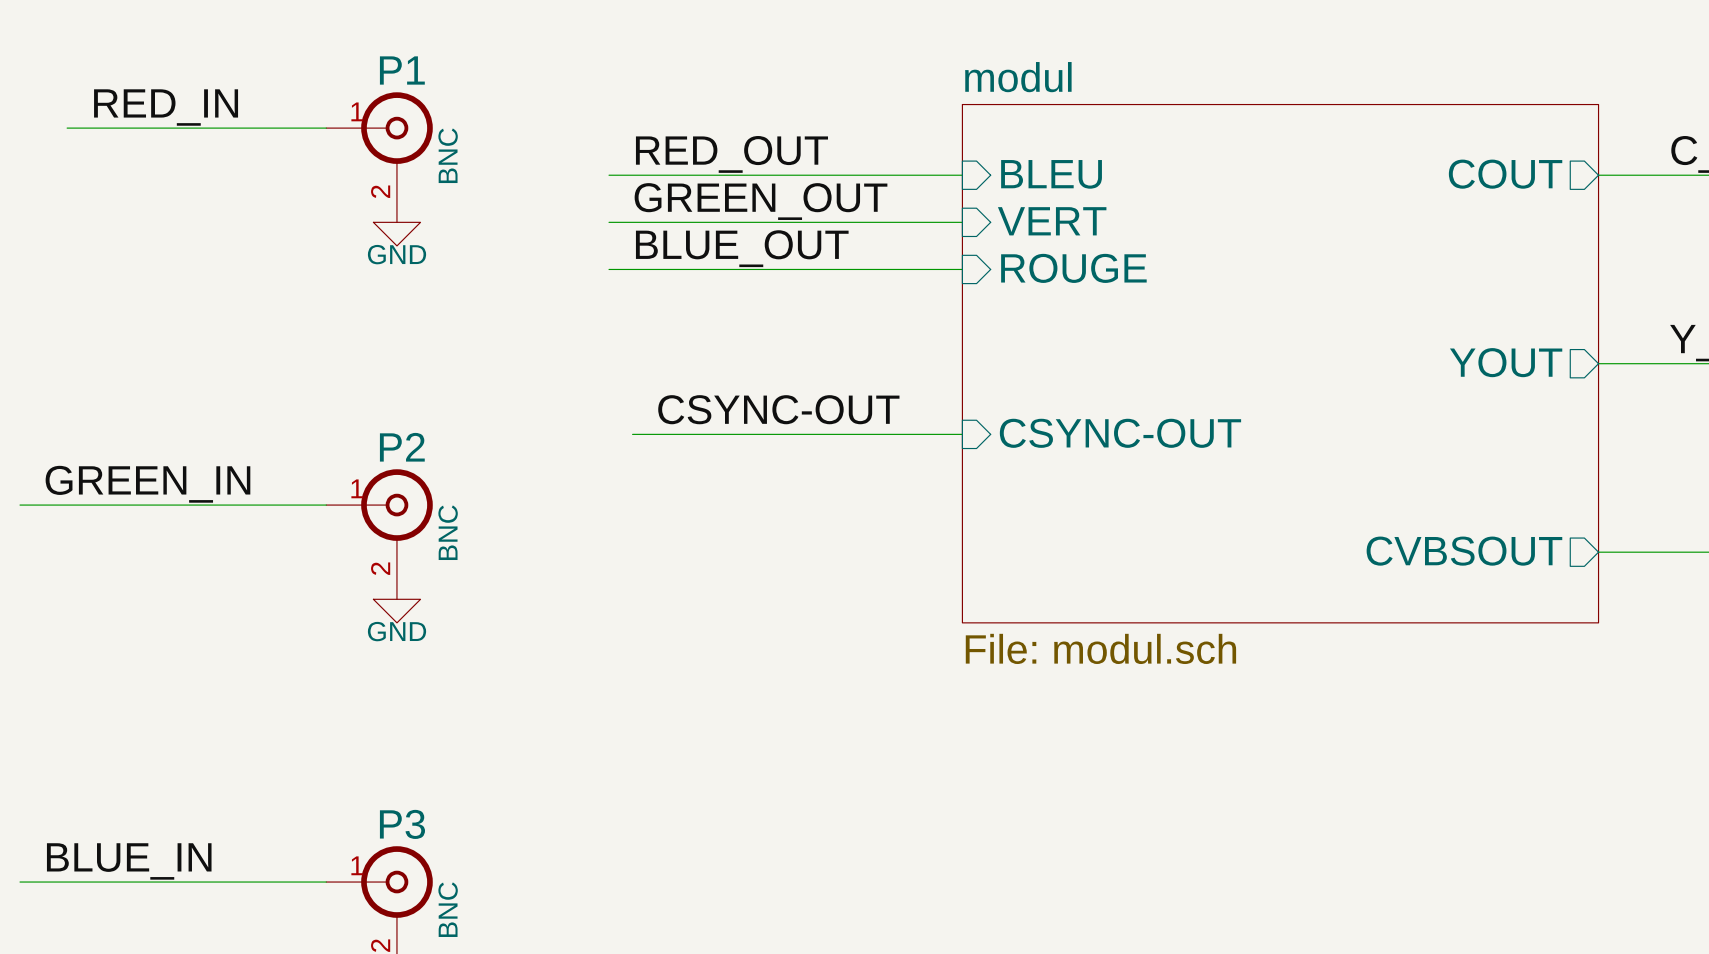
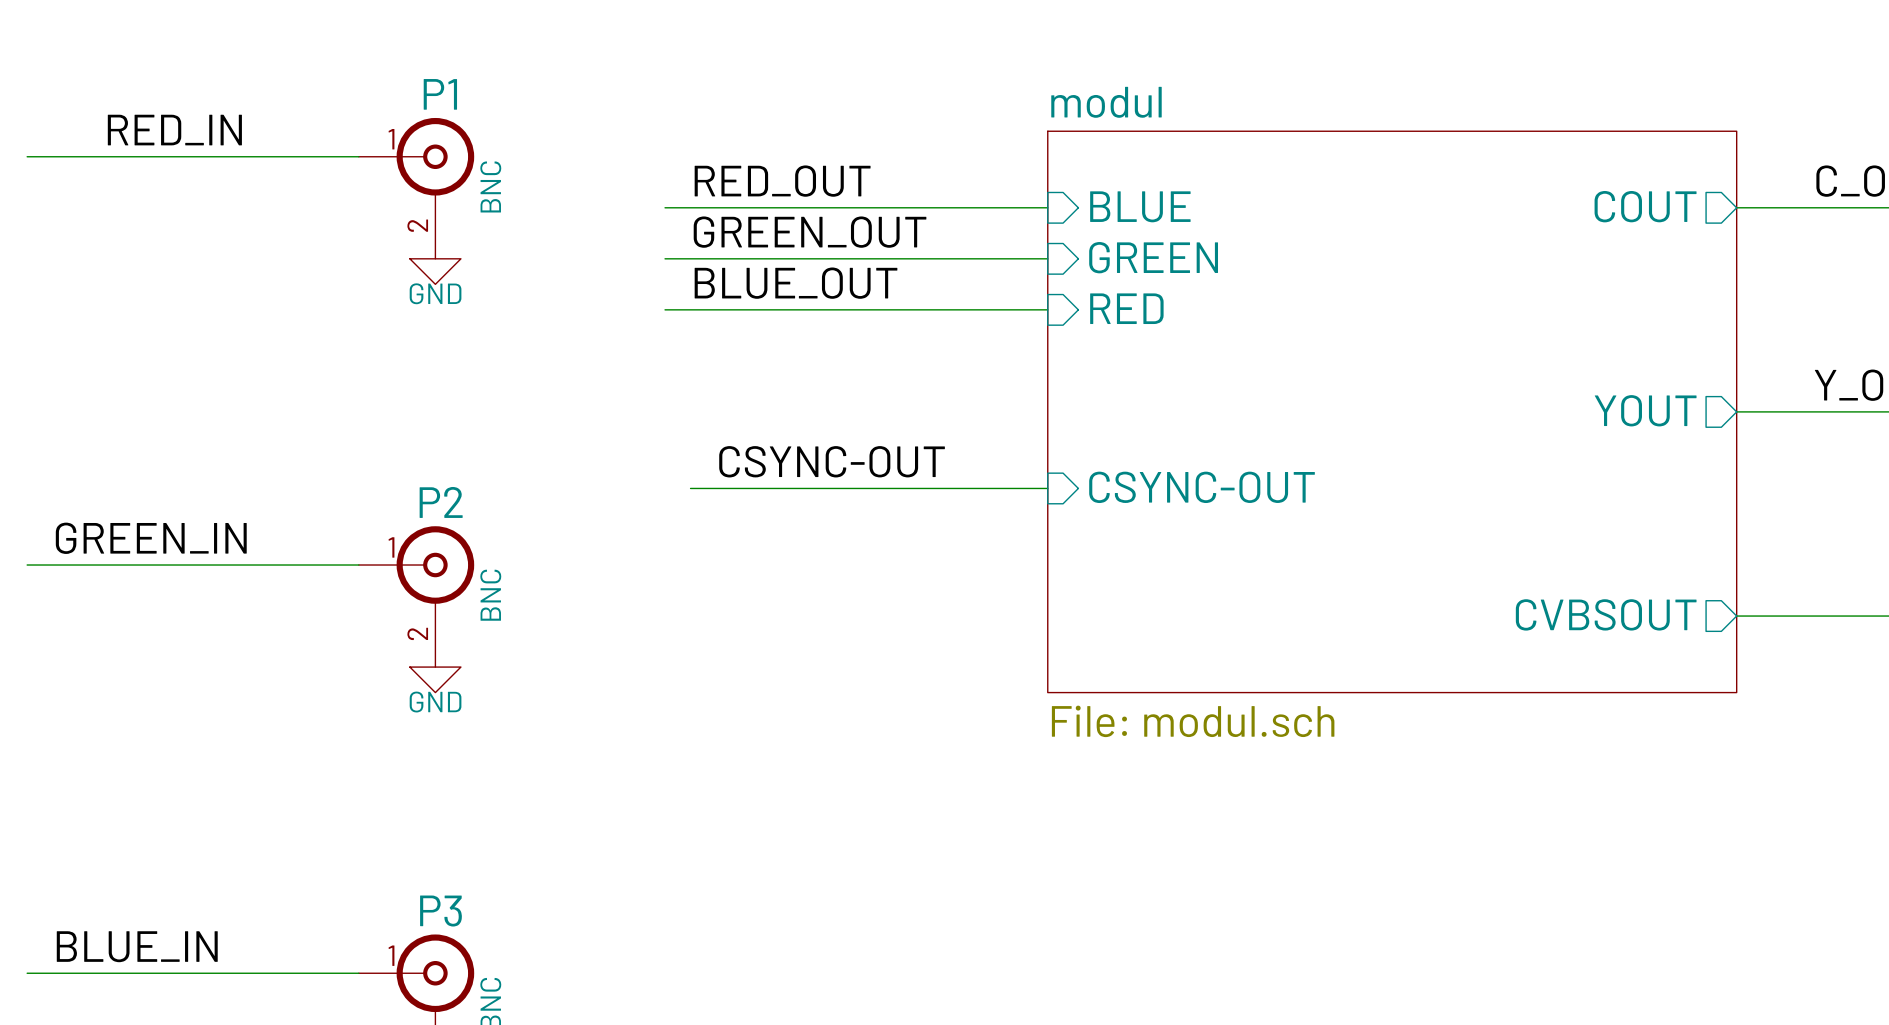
wire: none -> (27, 156) (78, 156)
sheet pin: BLEU (1051, 174) -> BLUE (1140, 206)
sheet pin: VERT (1052, 221) -> GREEN (1153, 257)
sheet pin: ROUGE (1073, 268) -> RED (1126, 308)

